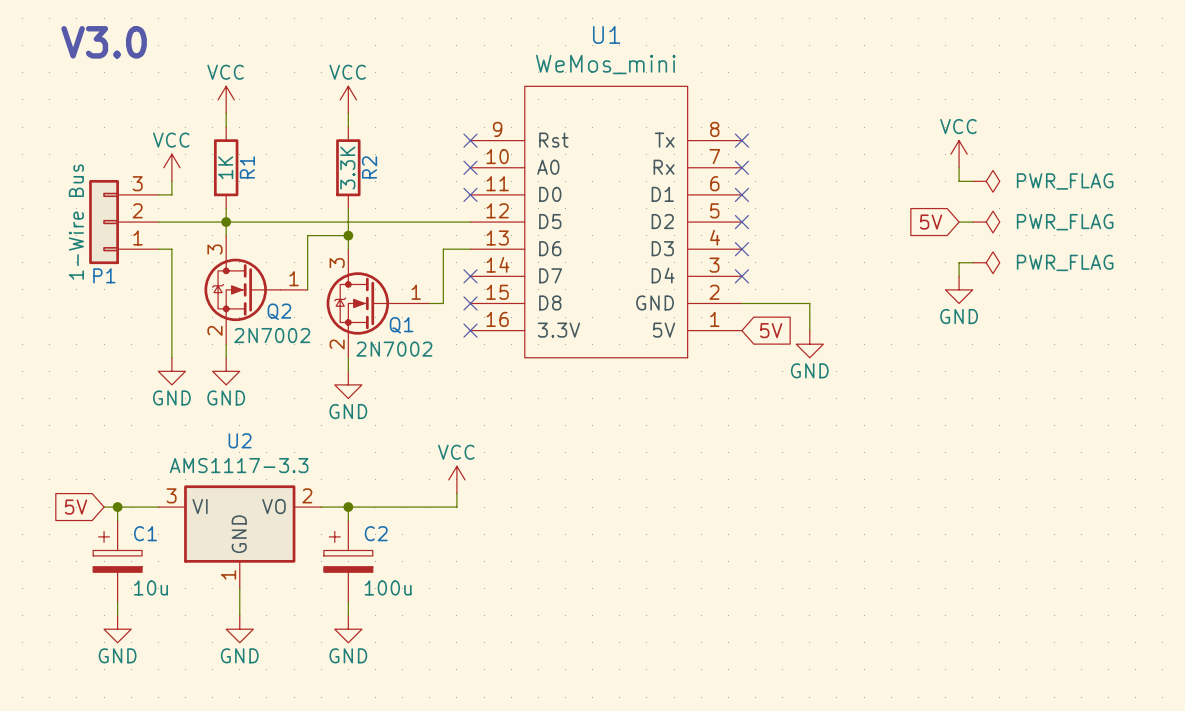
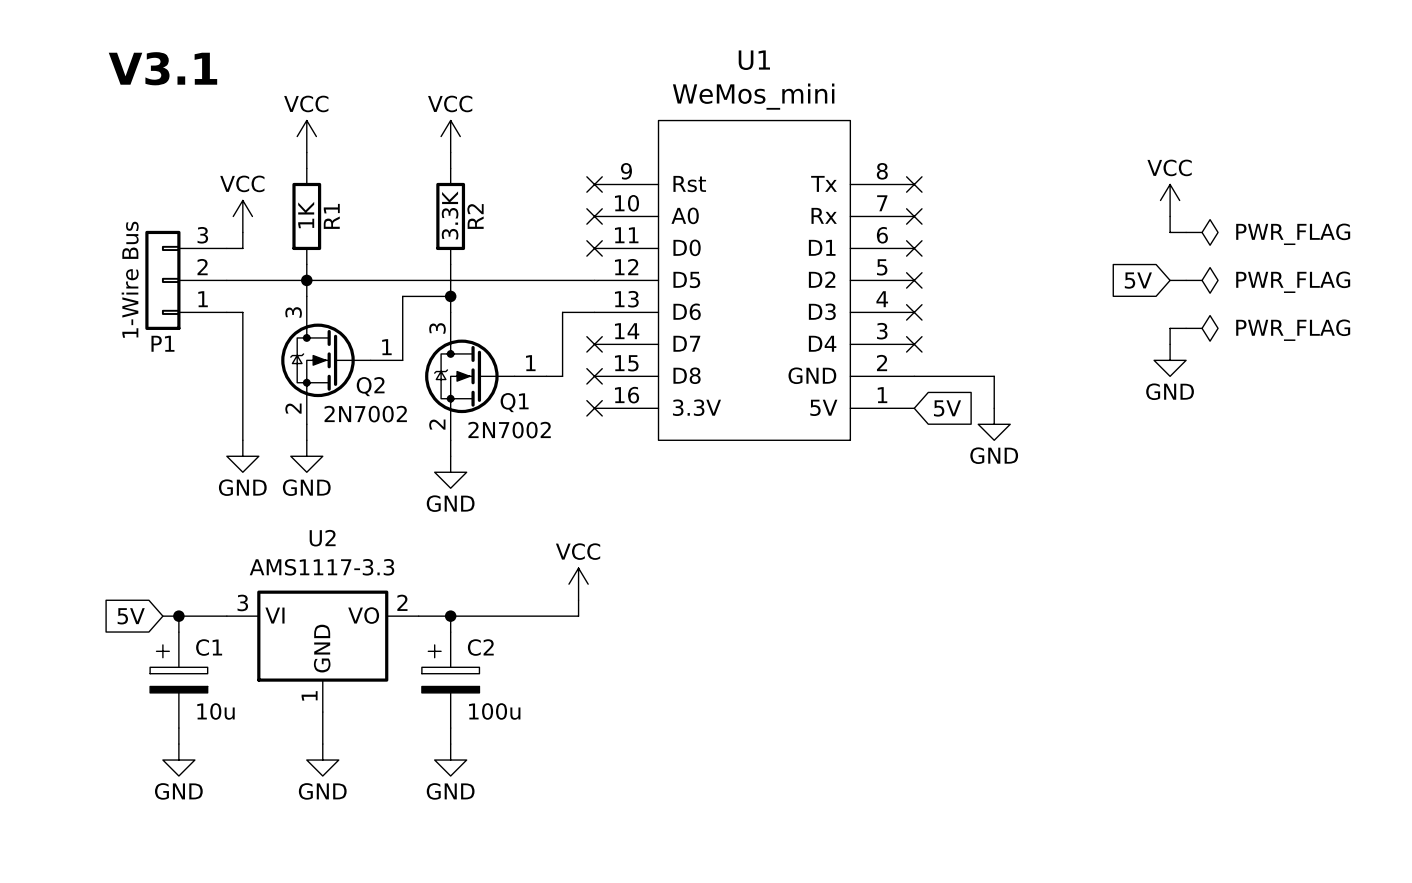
text: V3.0 (104, 42) -> V3.1 (162, 68)

